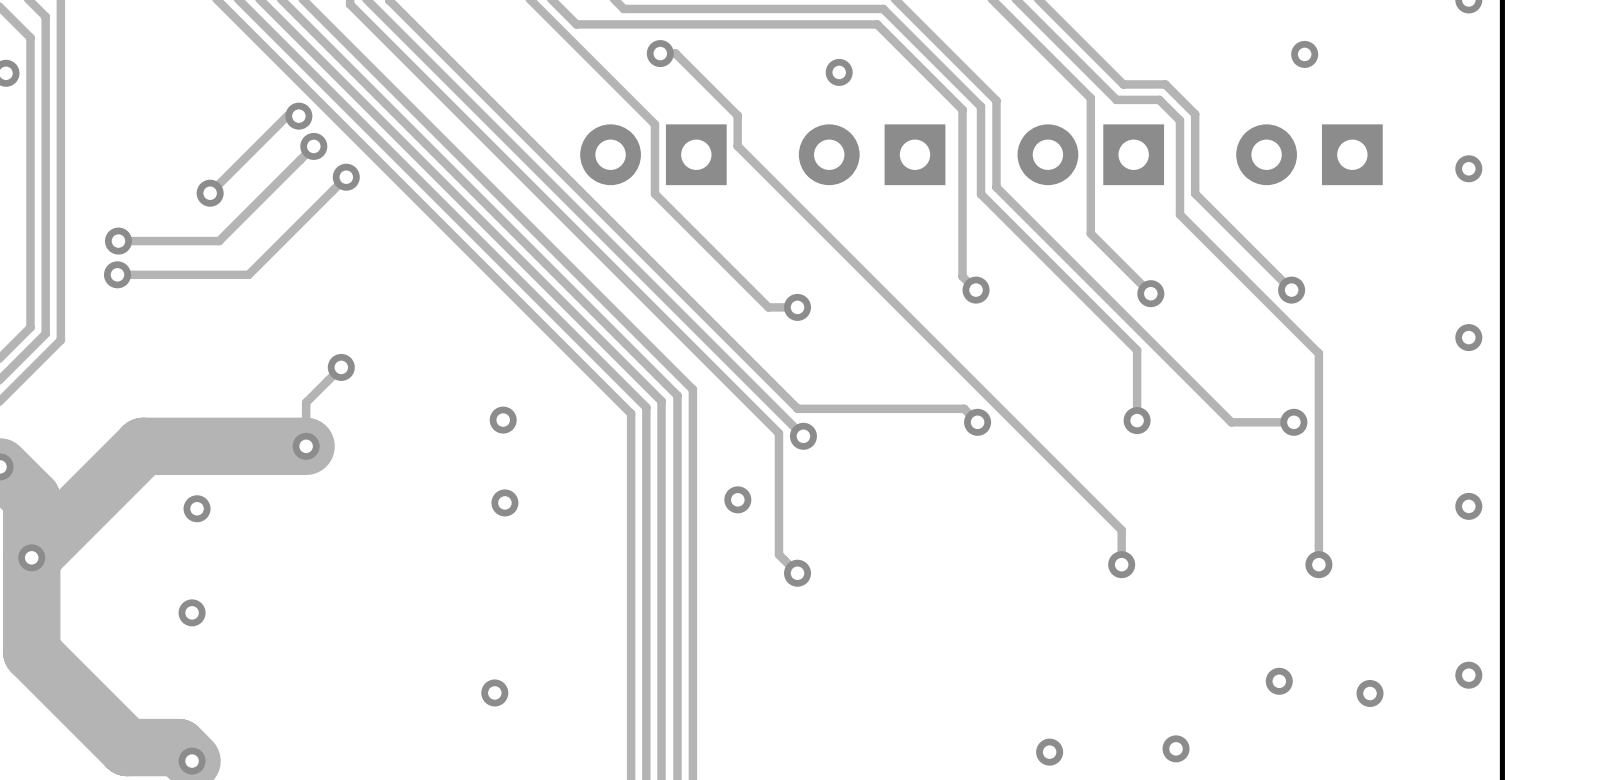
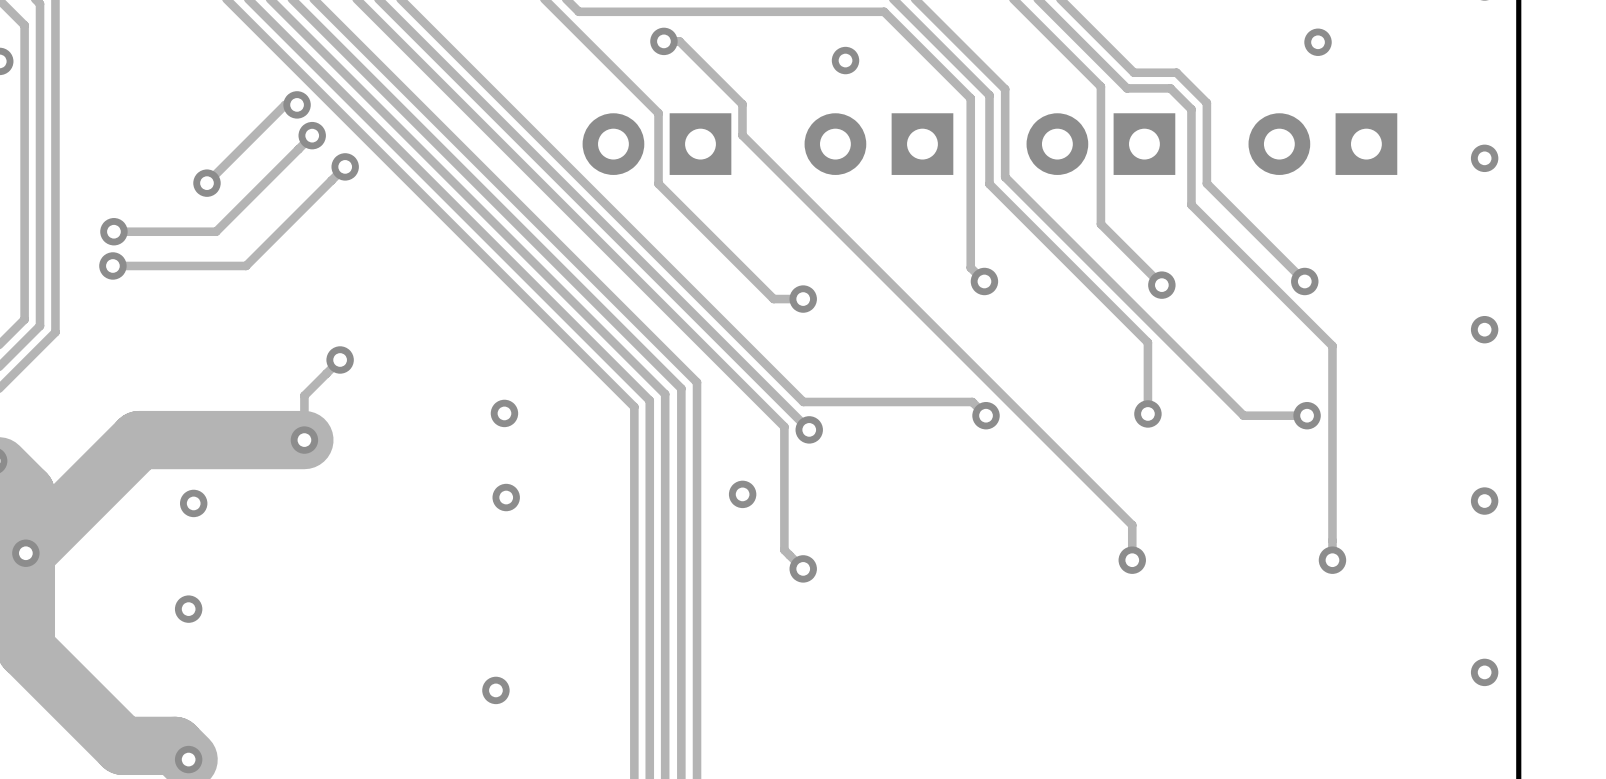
via: (1279, 681) -> none
via: (1370, 693) -> none
via: (1176, 748) -> none
via: (1049, 752) -> none

